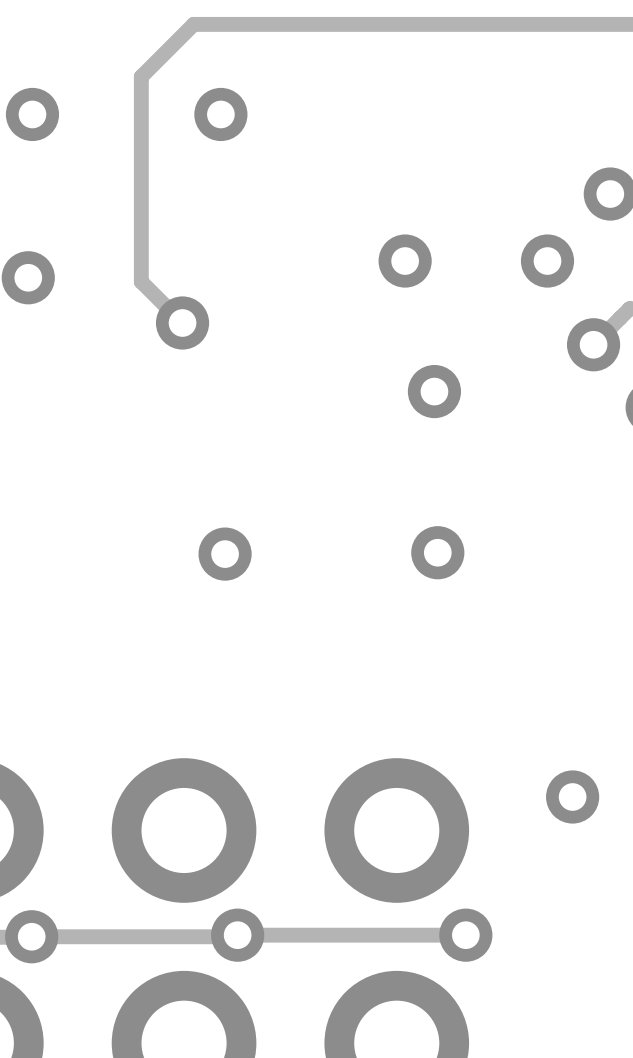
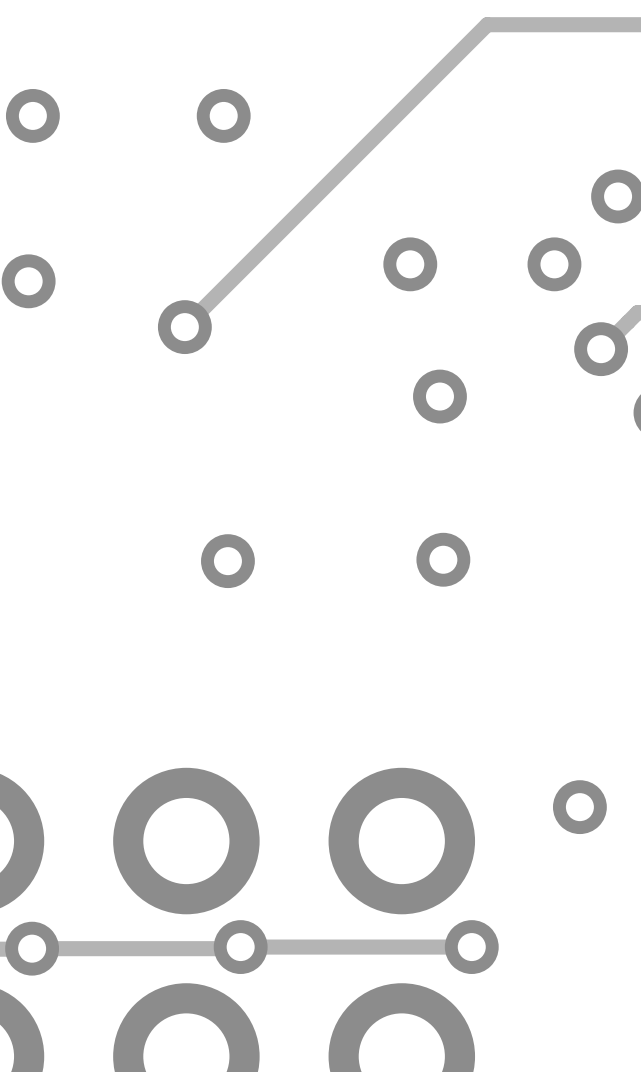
track: (481, 24) (193, 24) (141, 76) (141, 281) (182, 322) -> (487, 24) (184, 327)

